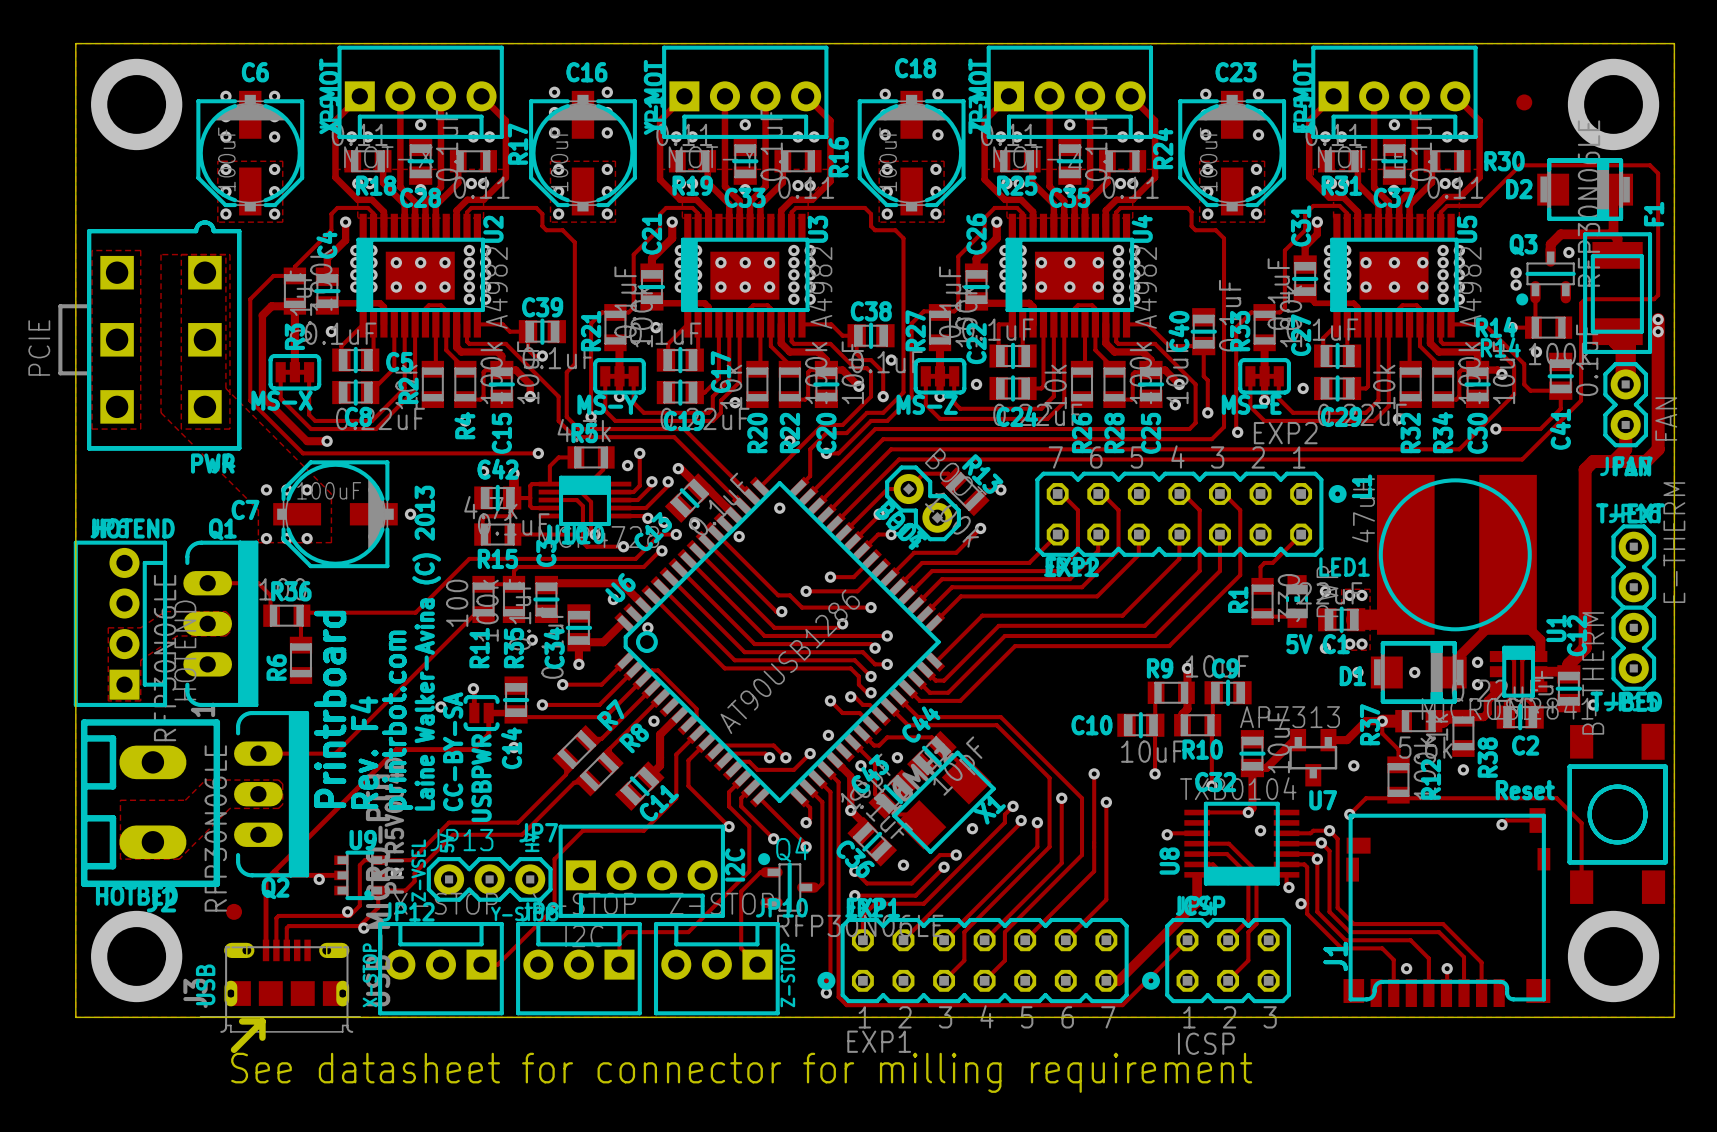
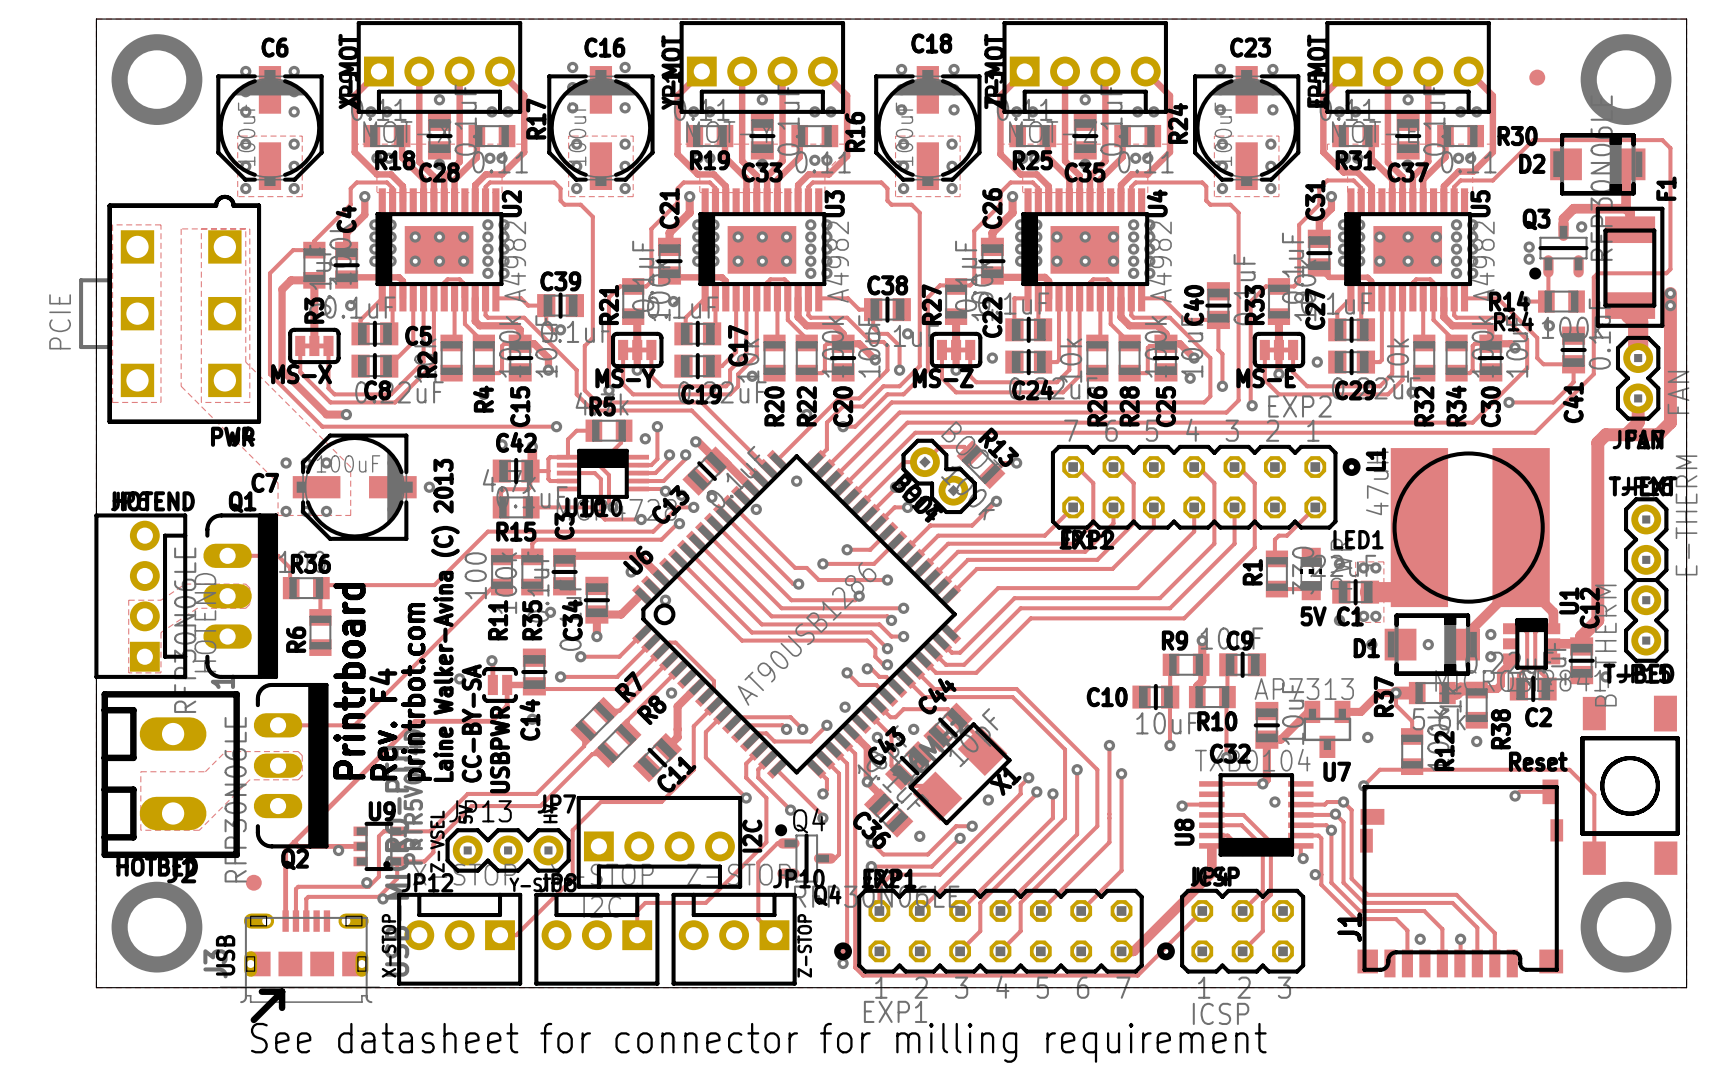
text: none -> Q4 (827, 895)

